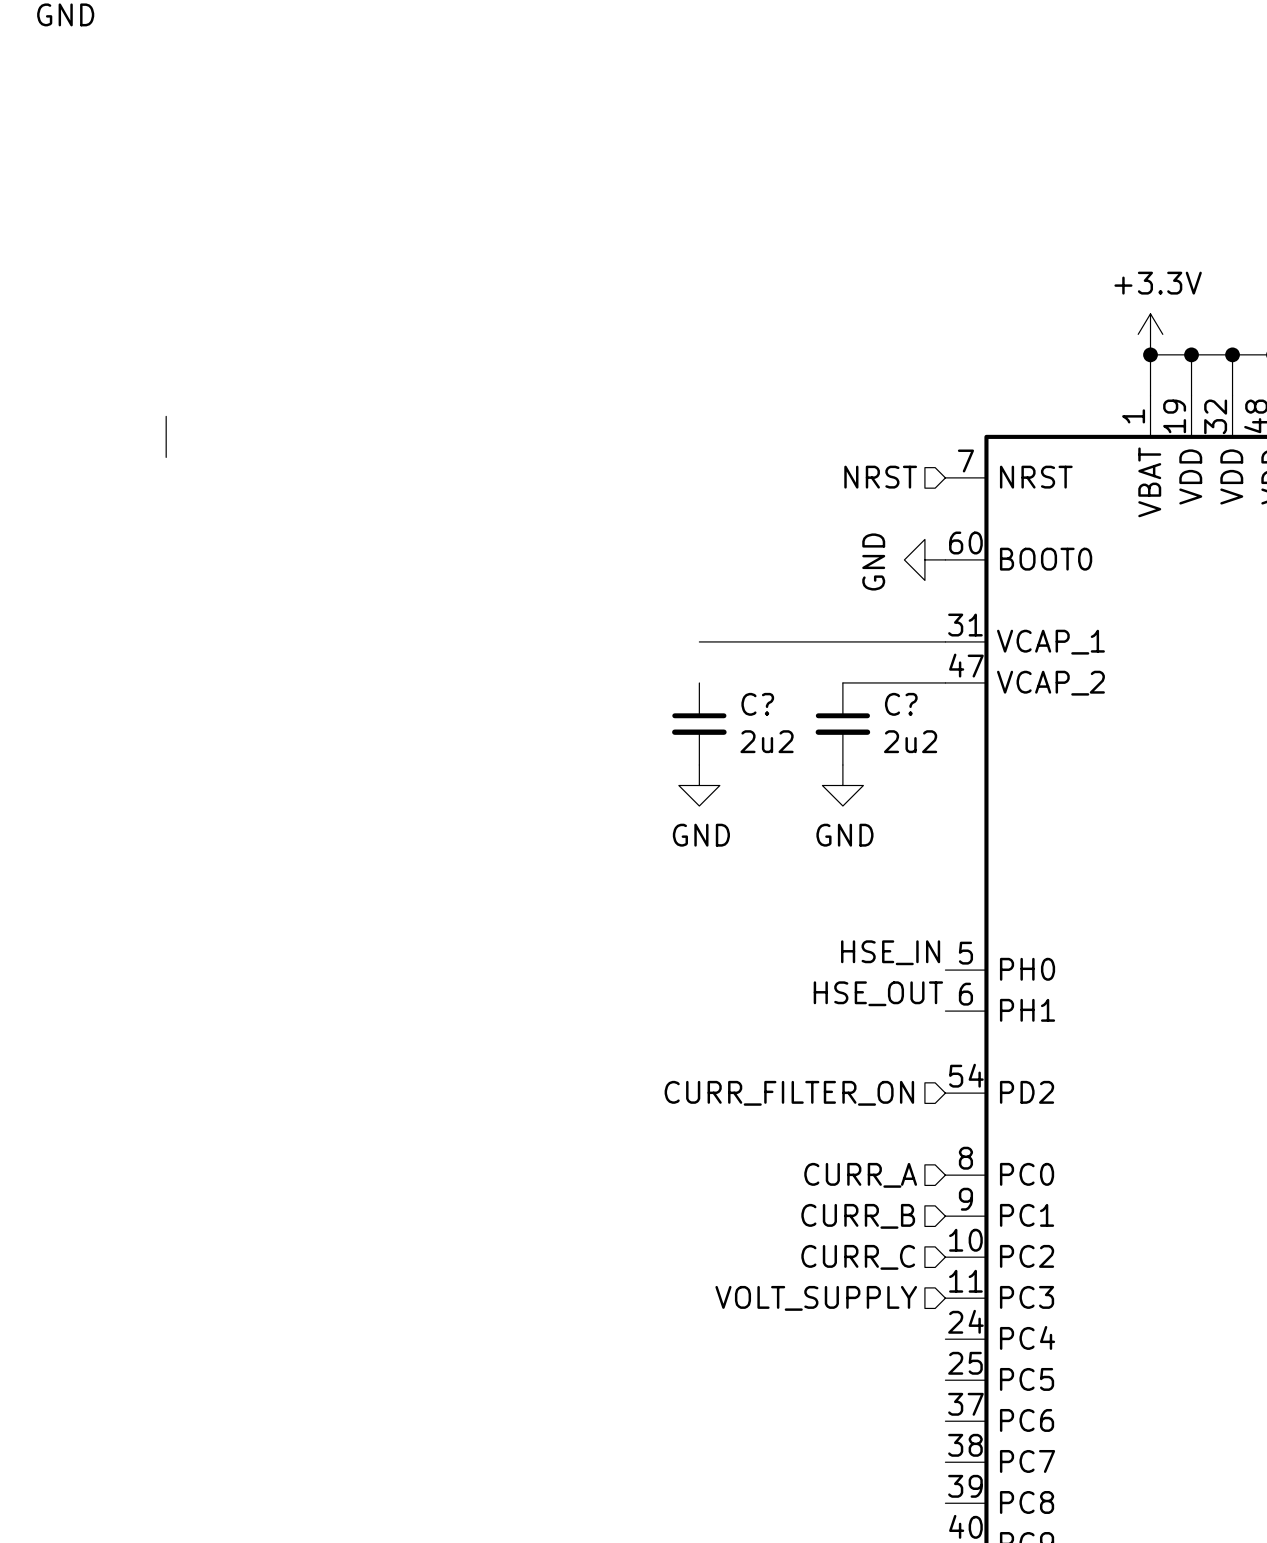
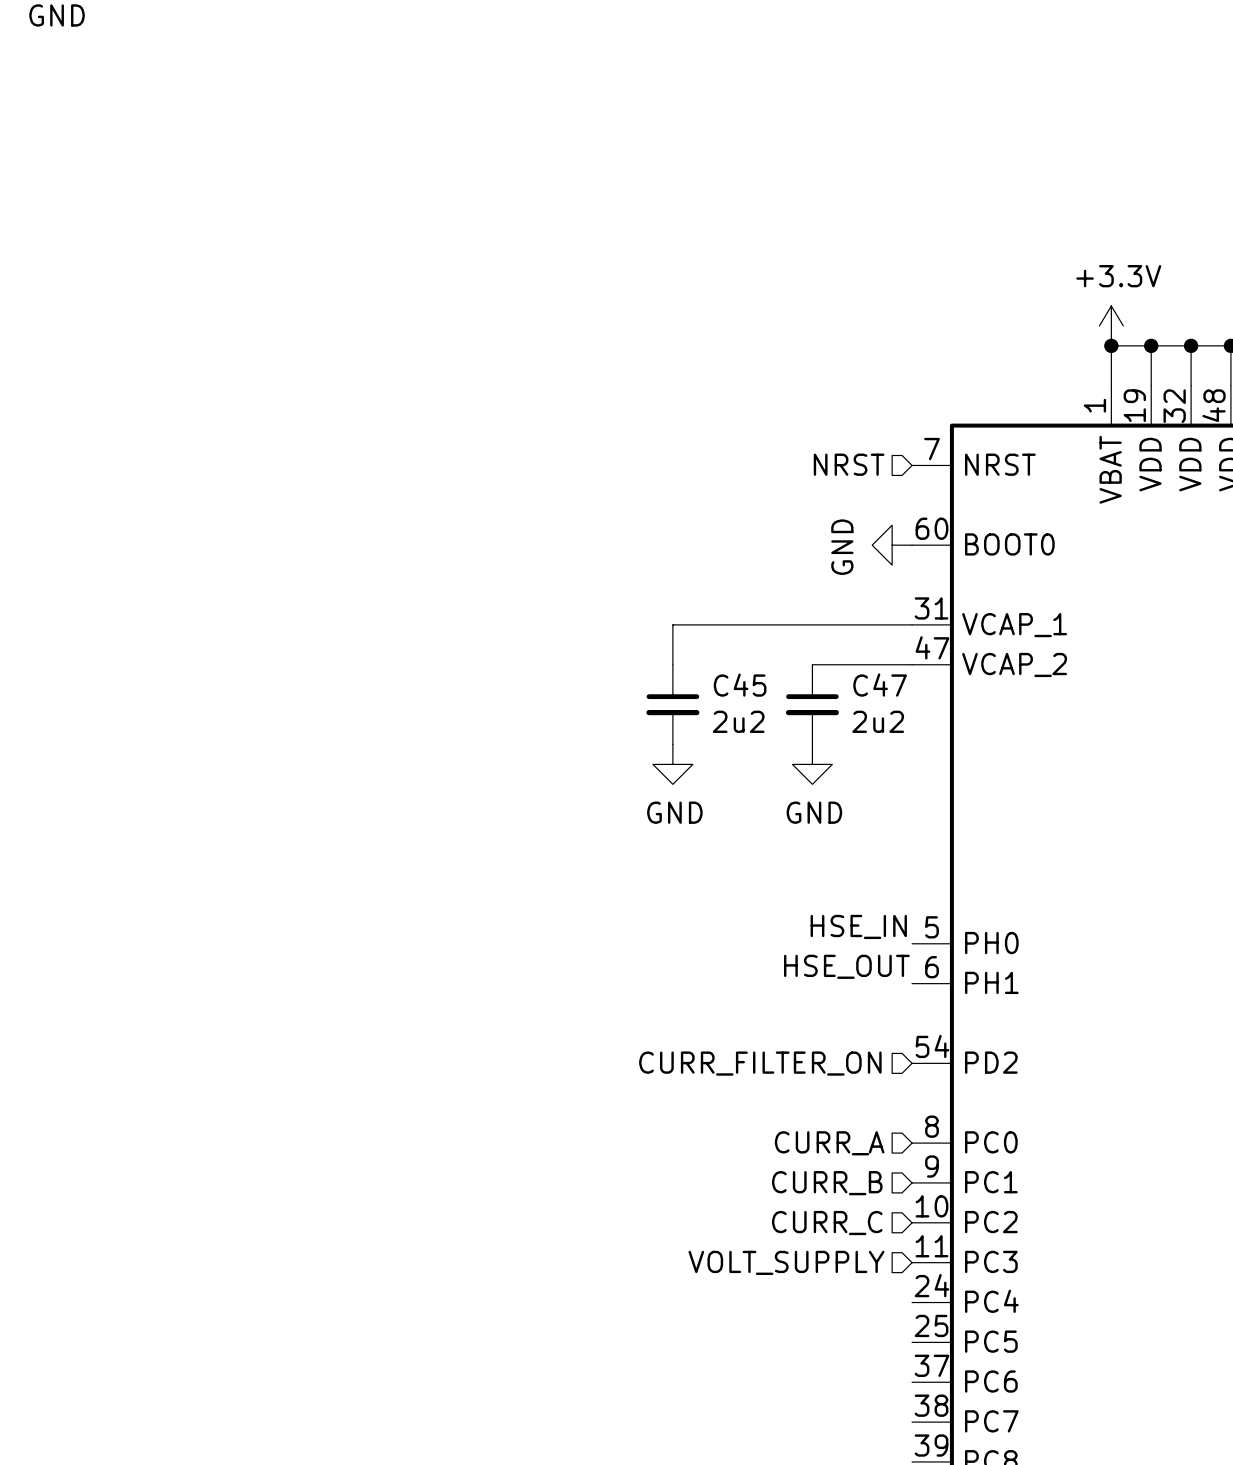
wire: (166, 416) (166, 457) -> none
wire: none -> (672, 624) (672, 664)
C? name: C? (757, 704) -> C45 (740, 685)
C? name: C? (901, 704) -> C47 (880, 685)

